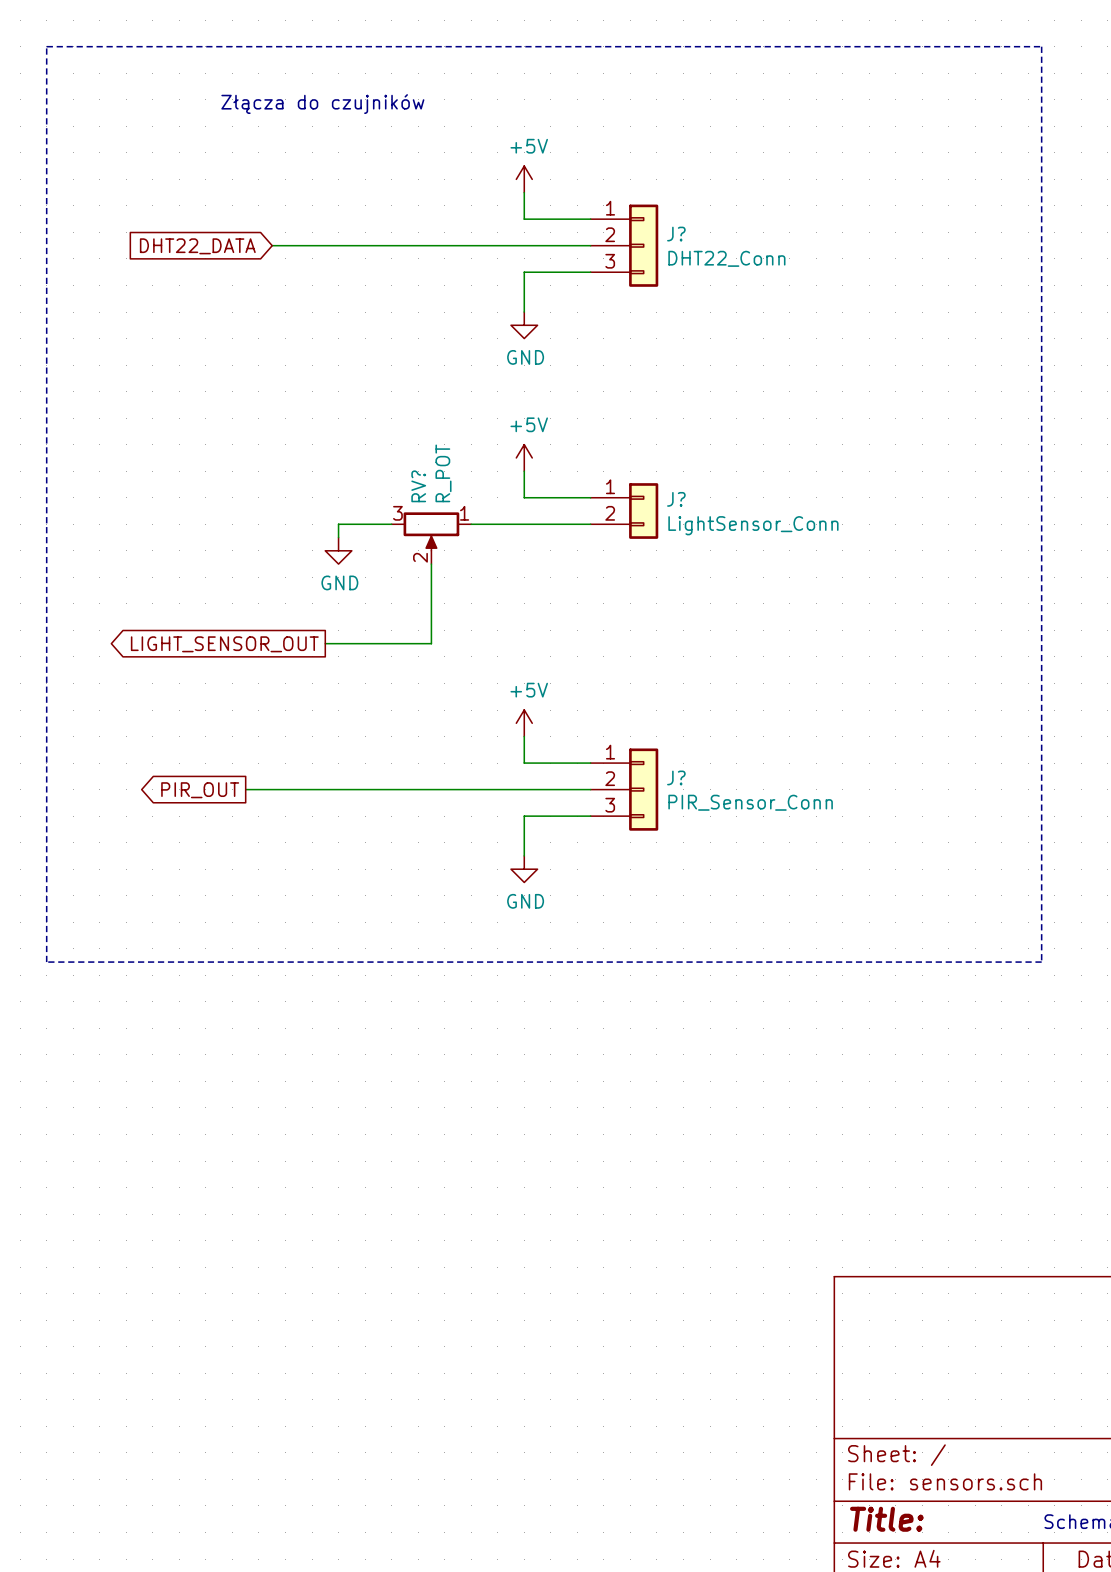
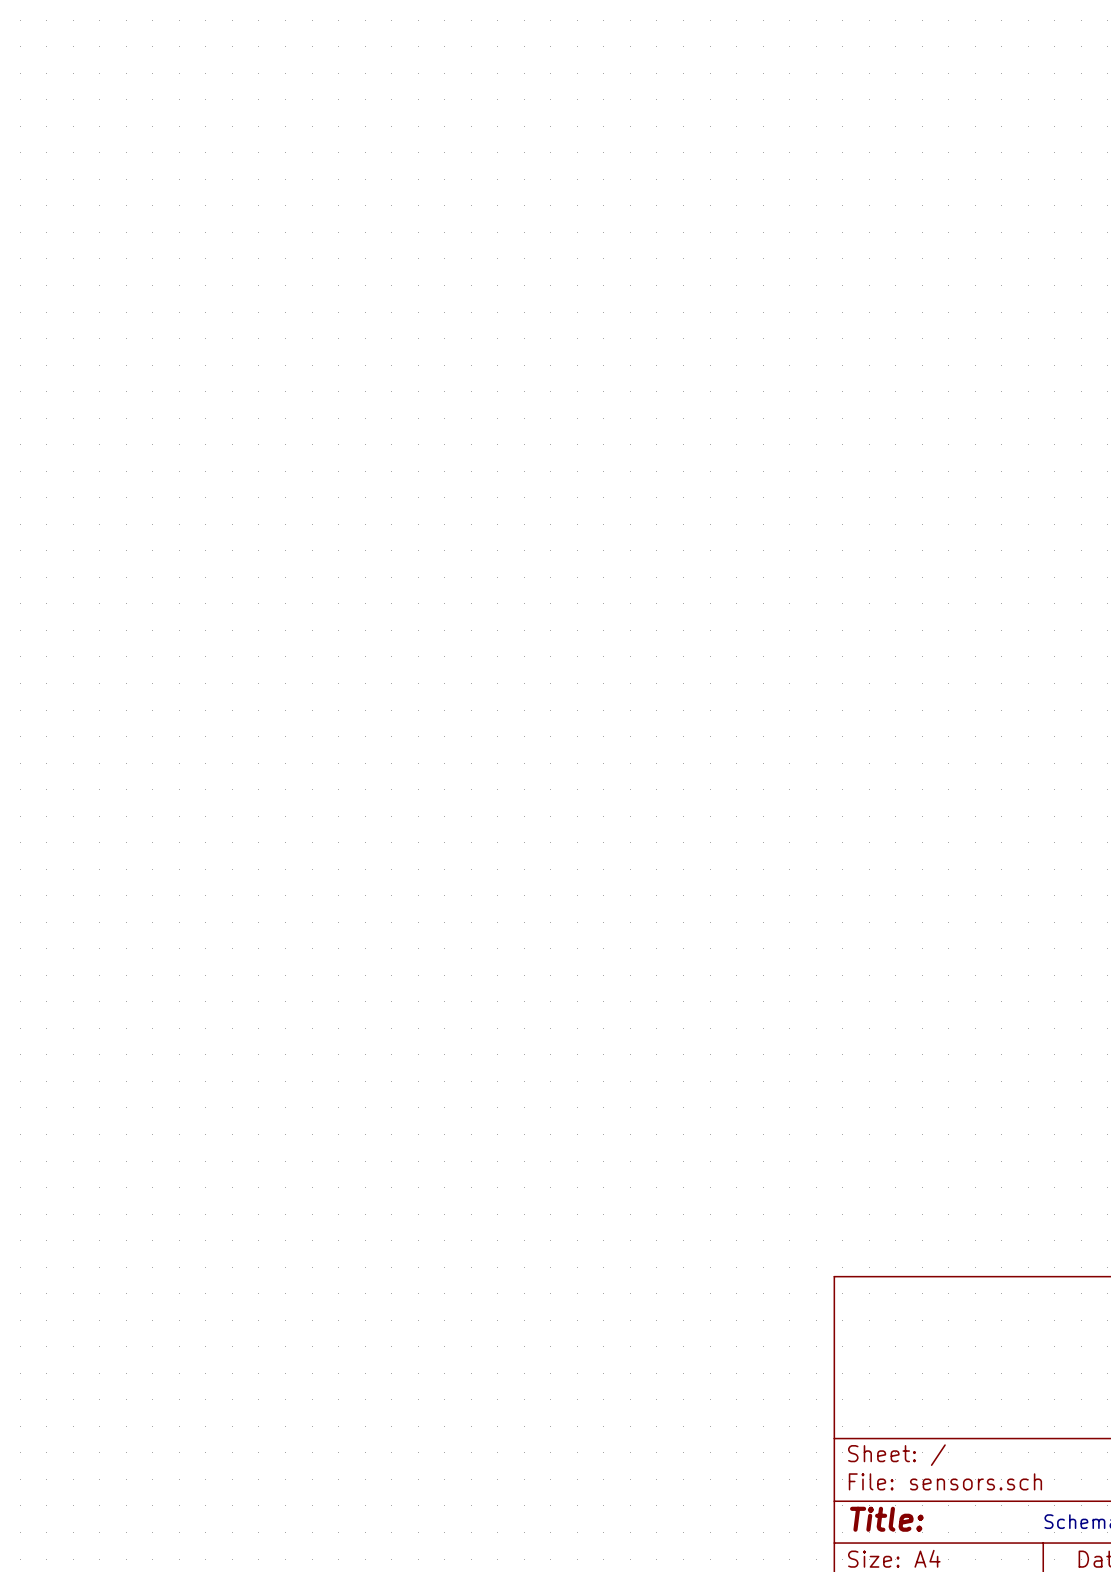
line: (46, 46) (1041, 46) (1041, 962) (46, 962) (46, 46) -> none
text: Złącza do czujników (322, 104) -> none
power symbol: +5V (524, 179) -> none
wire: (524, 192) (524, 219) (590, 219) -> none
wire: (272, 245) (590, 245) -> none
J?: DHT22_Conn (624, 245) -> none
global label: DHT22_DATA (197, 246) -> none
wire: (590, 272) (524, 272) (524, 312) -> none
power symbol: GND (524, 325) -> none
power symbol: +5V (524, 457) -> none
wire: (524, 471) (524, 497) (590, 497) -> none
J?: LightSensor_Conn (624, 511) -> none
wire: (391, 524) (338, 524) (338, 537) -> none
wire: (471, 524) (590, 524) -> none
RV?: R_POT (431, 538) -> none
power symbol: GND (338, 550) -> none
wire: (431, 564) (431, 643) (325, 643) -> none
global label: LIGHT_SENSOR_OUT (224, 644) -> none
power symbol: +5V (524, 723) -> none
wire: (524, 736) (524, 763) (590, 763) -> none
wire: (245, 789) (590, 789) -> none
J?: PIR_Sensor_Conn (624, 789) -> none
global label: PIR_OUT (200, 790) -> none
wire: (590, 816) (524, 816) (524, 855) -> none
power symbol: GND (524, 869) -> none

